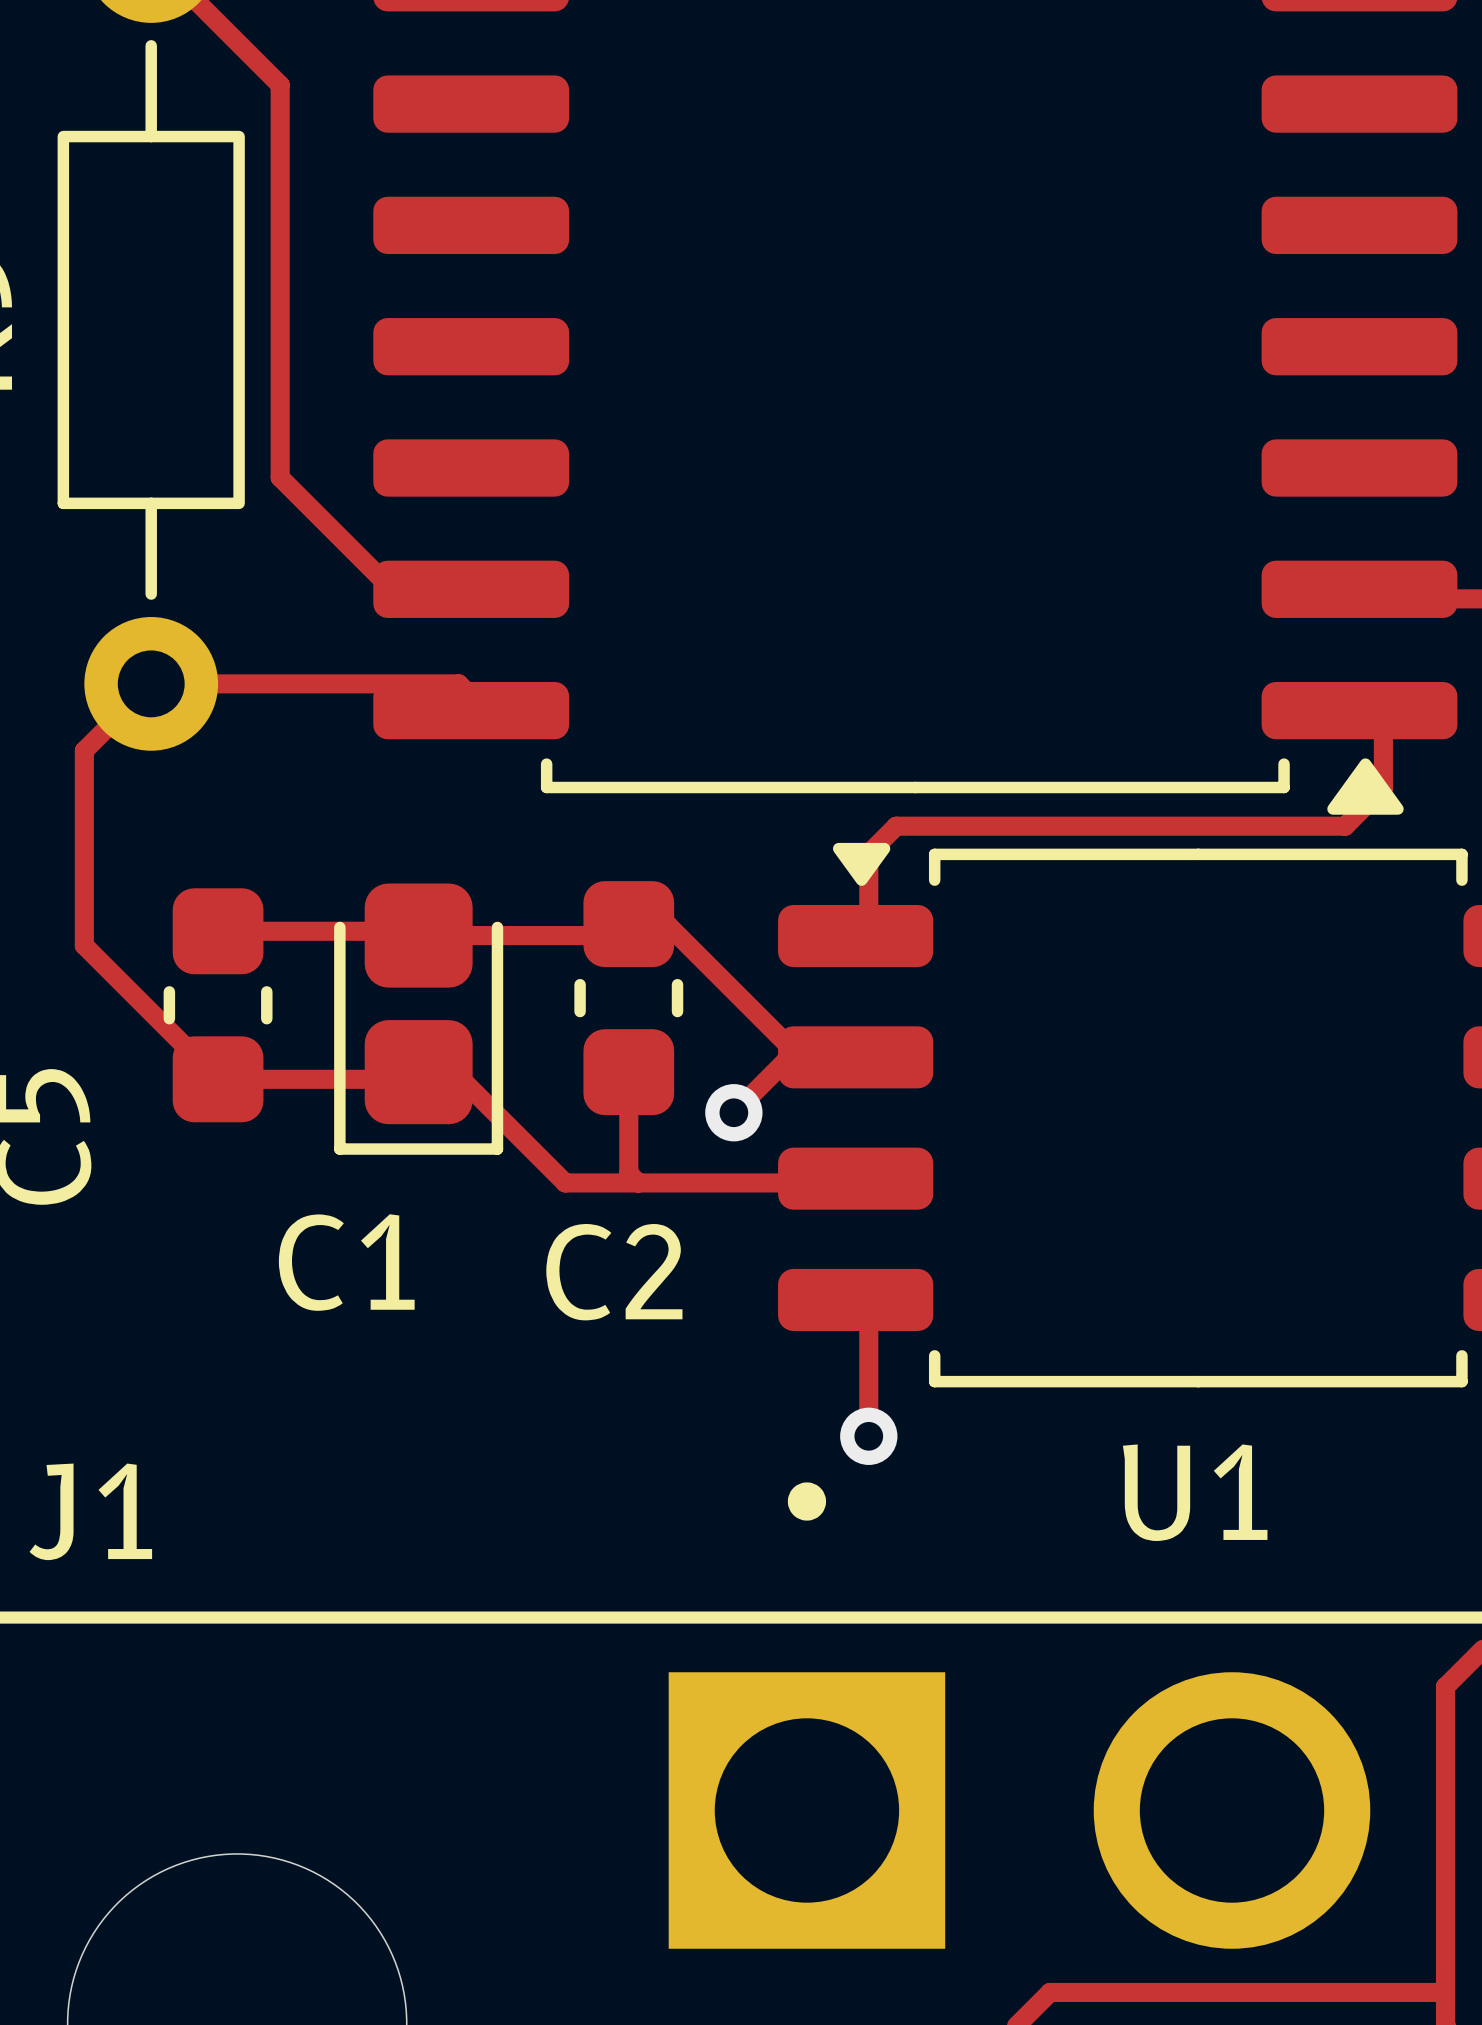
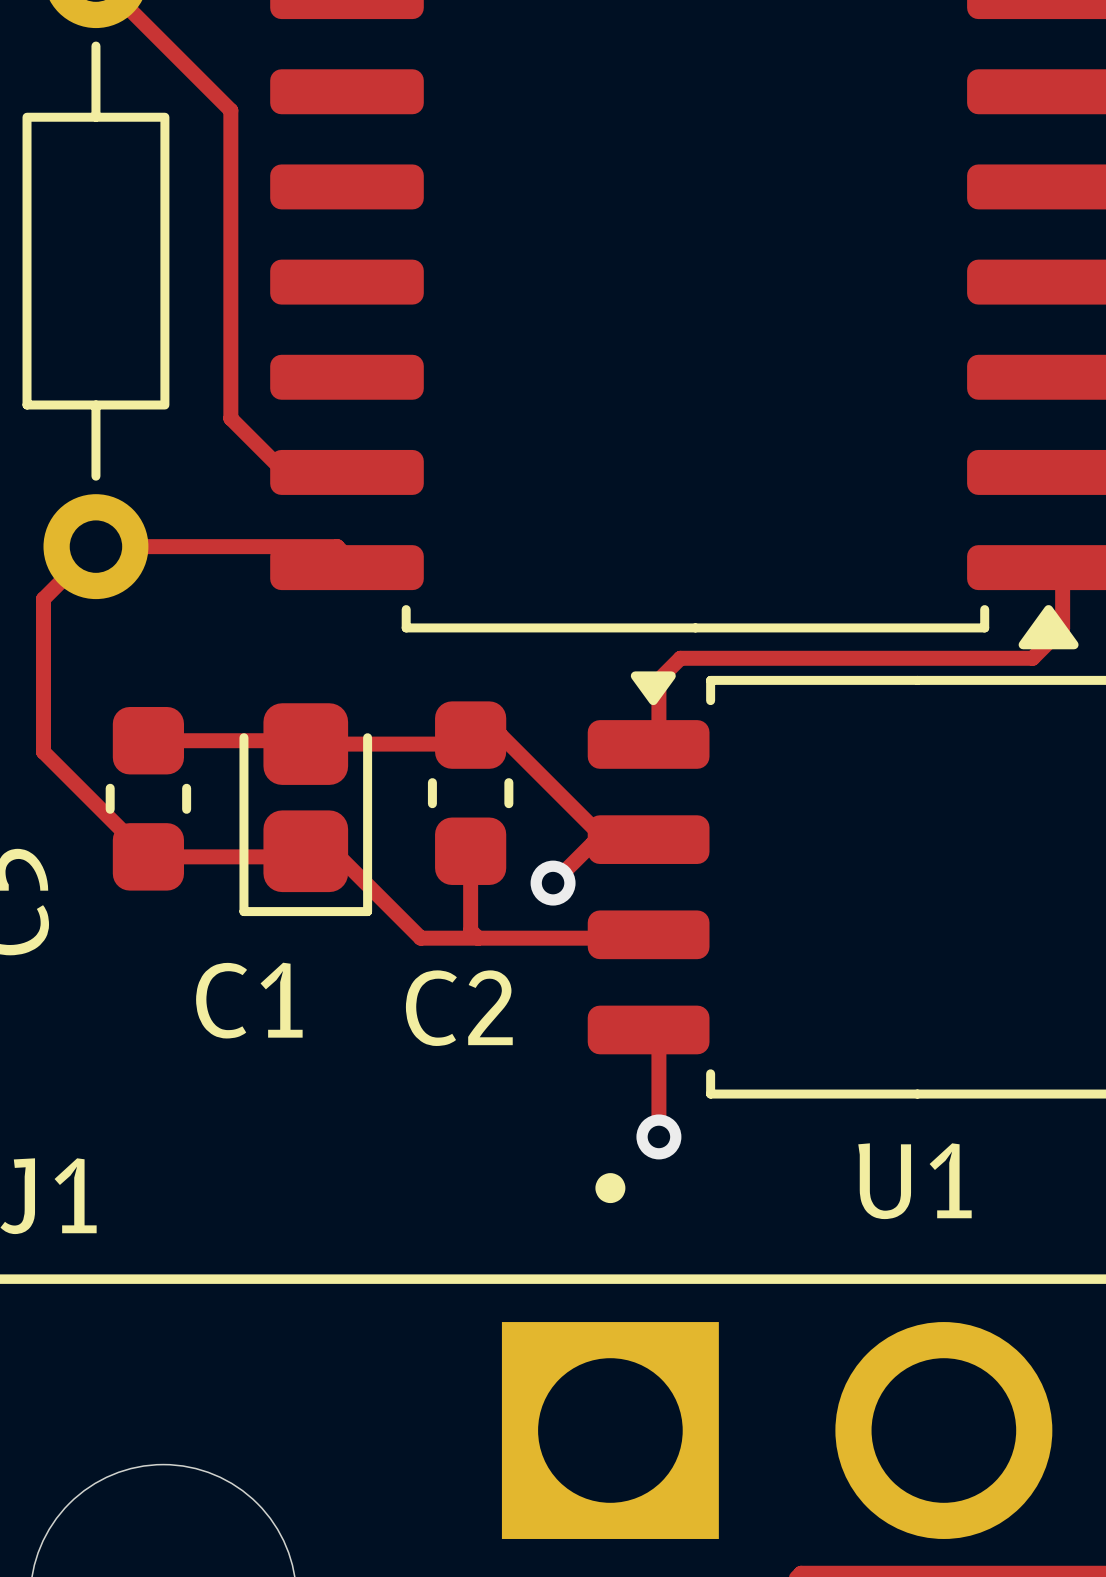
track: (280, 84) (280, 477) (323, 520) -> (197, 76) (230, 110) (230, 418)

